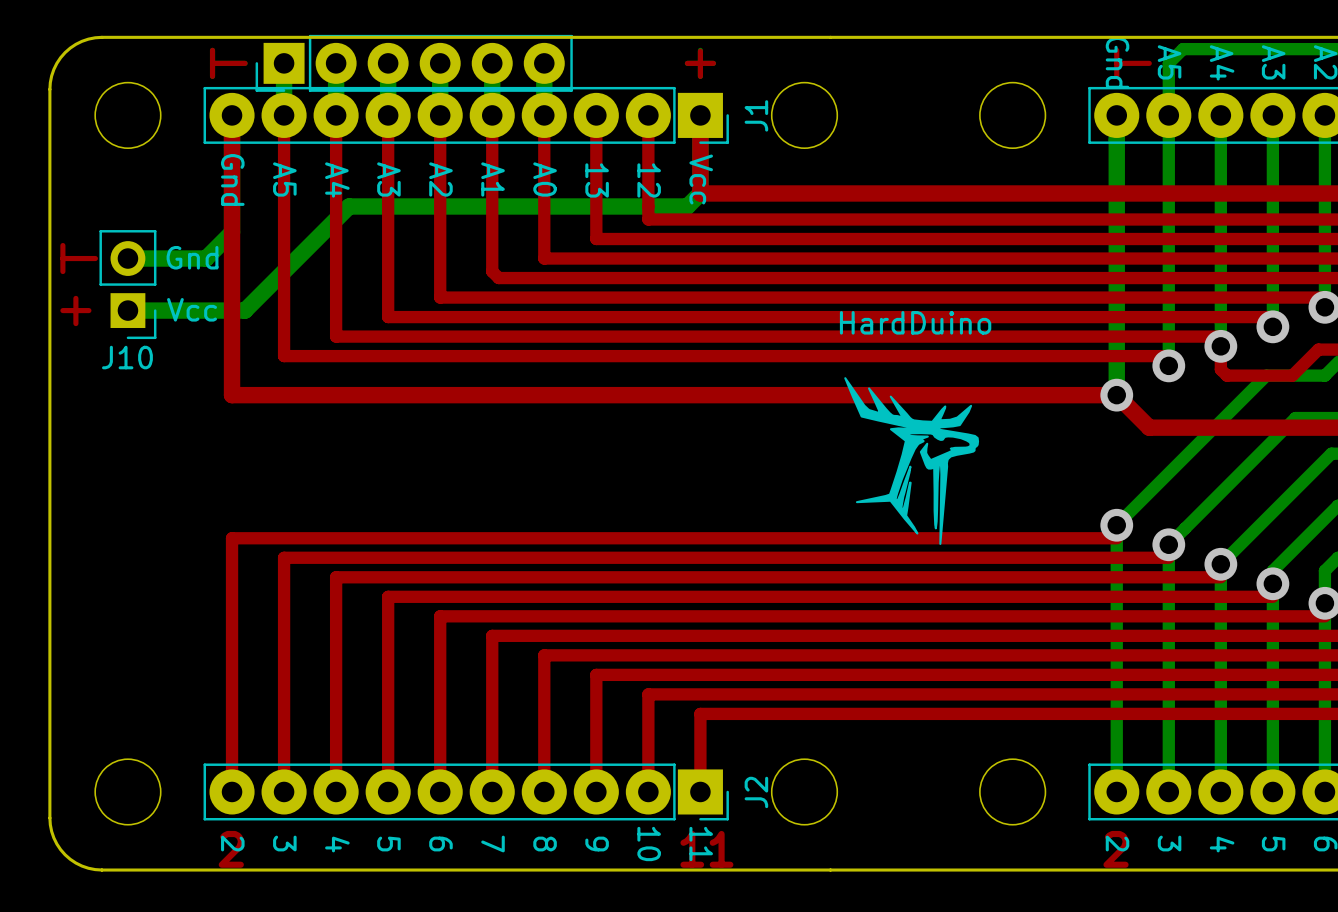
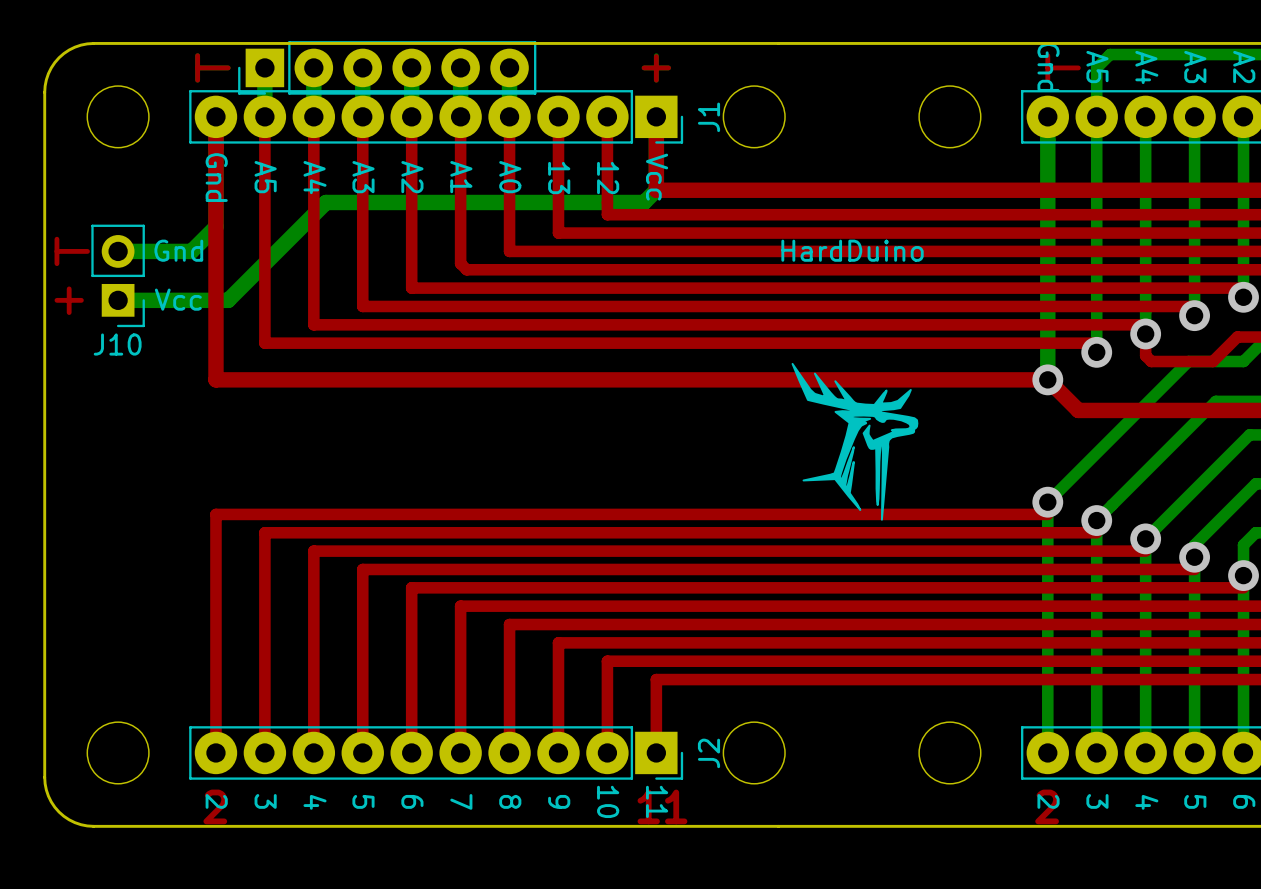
text position: HardDuino (915, 322) -> HardDuino (852, 250)

